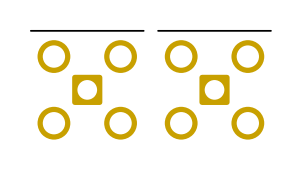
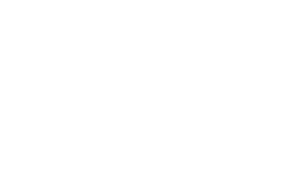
part: (87, 84) -> none
part: (214, 84) -> none

